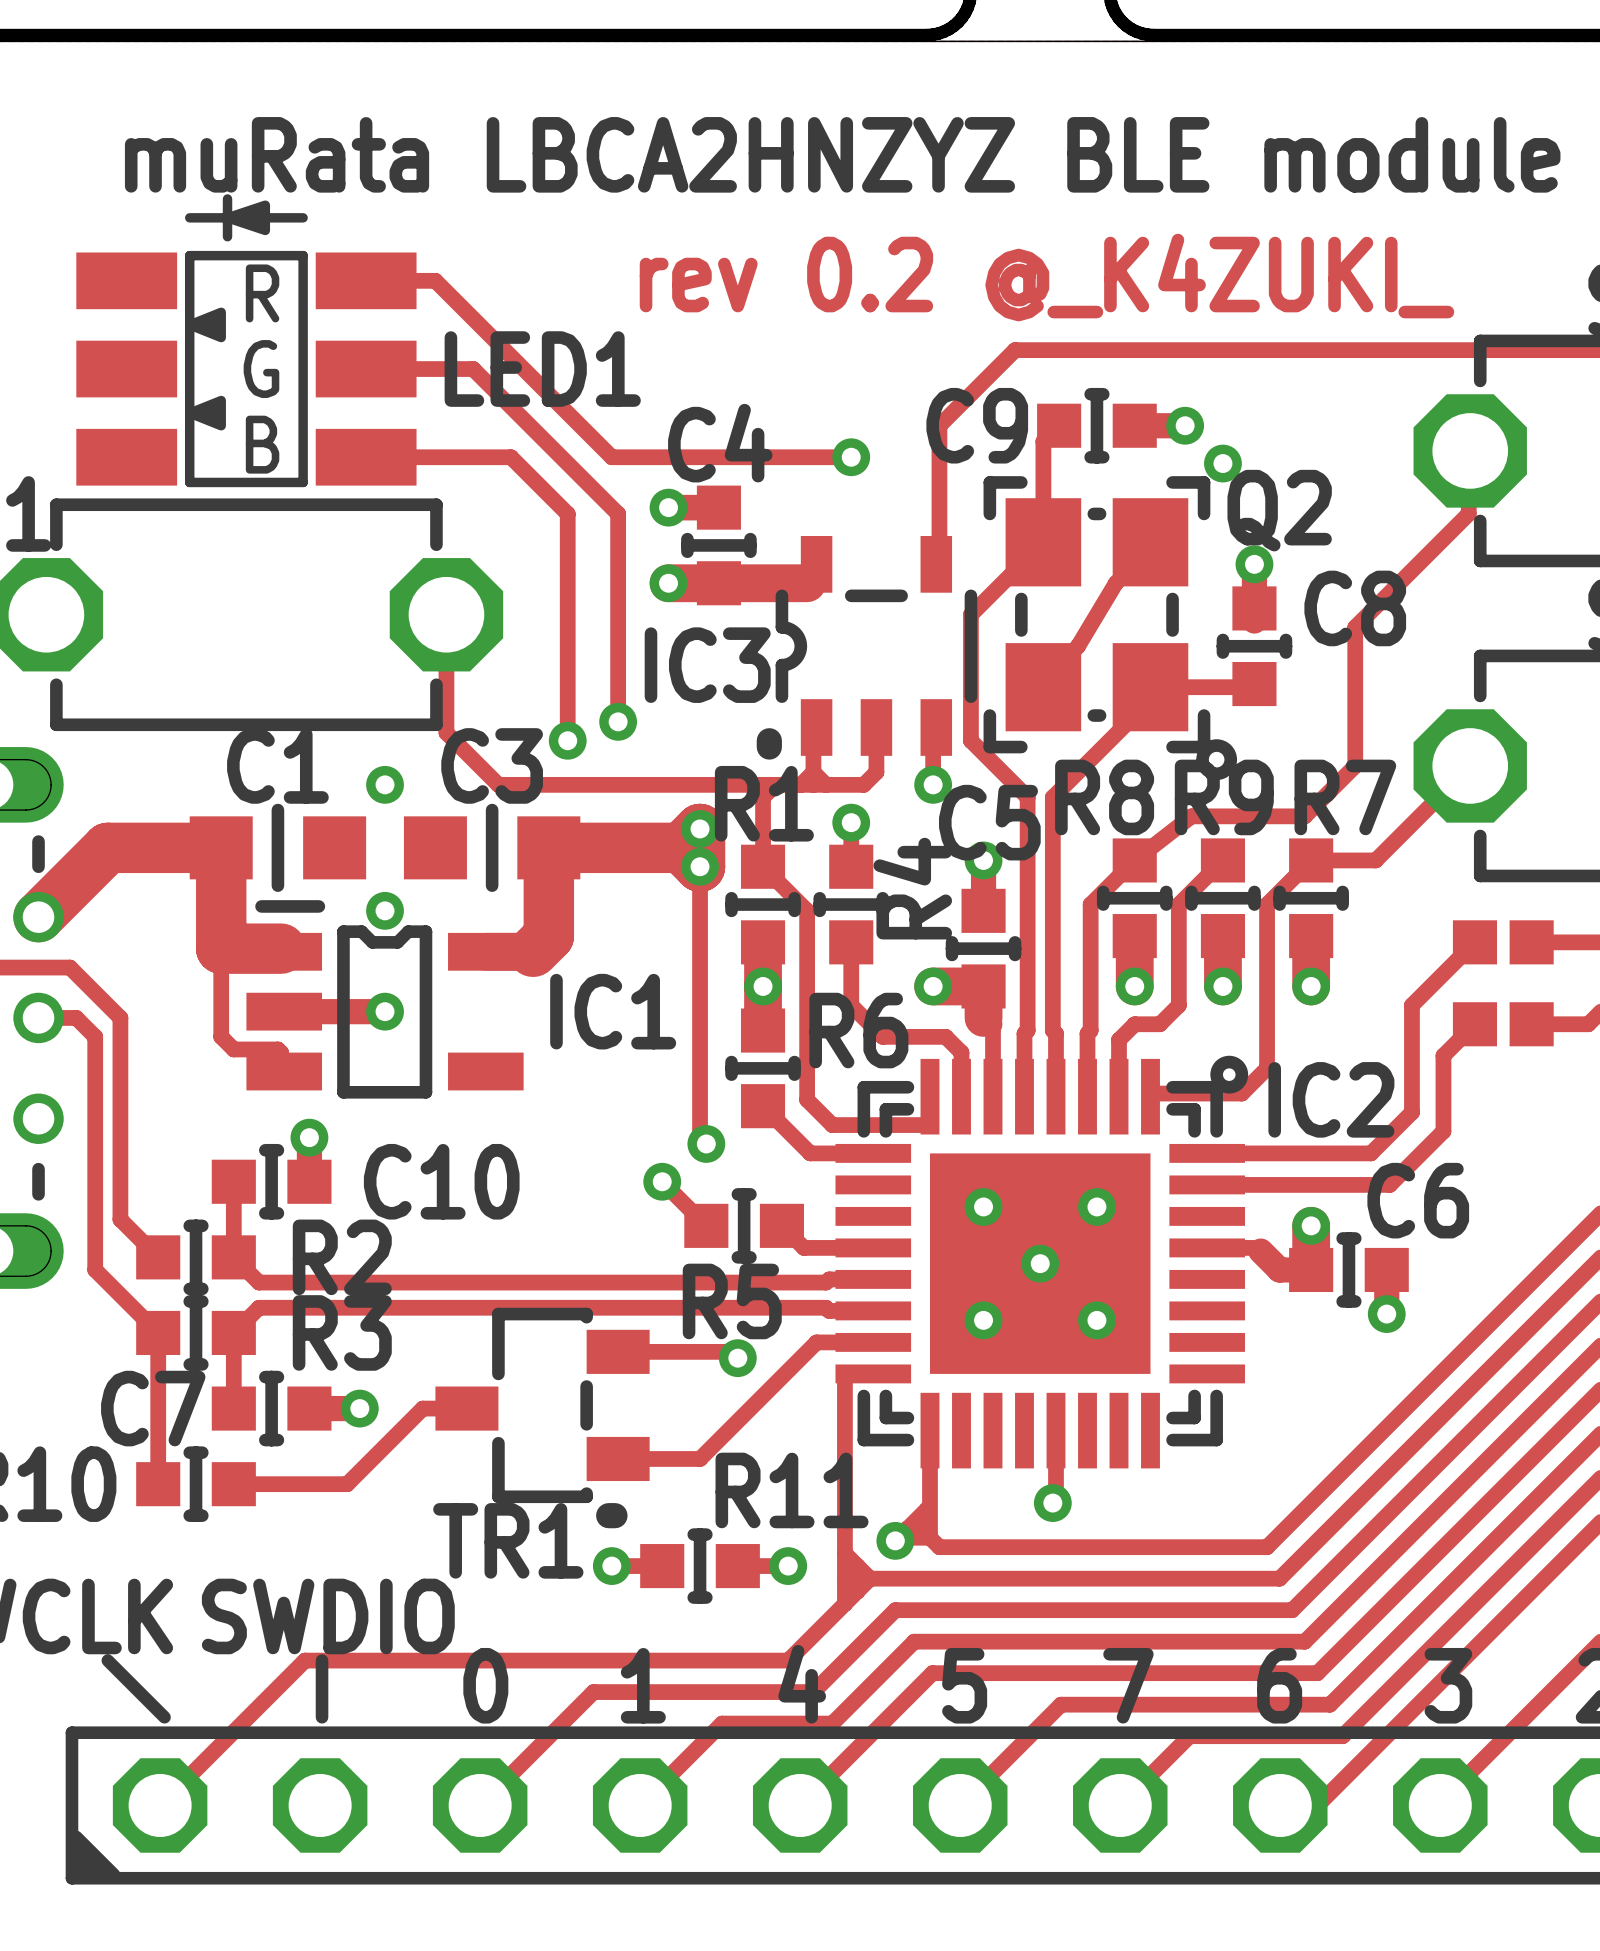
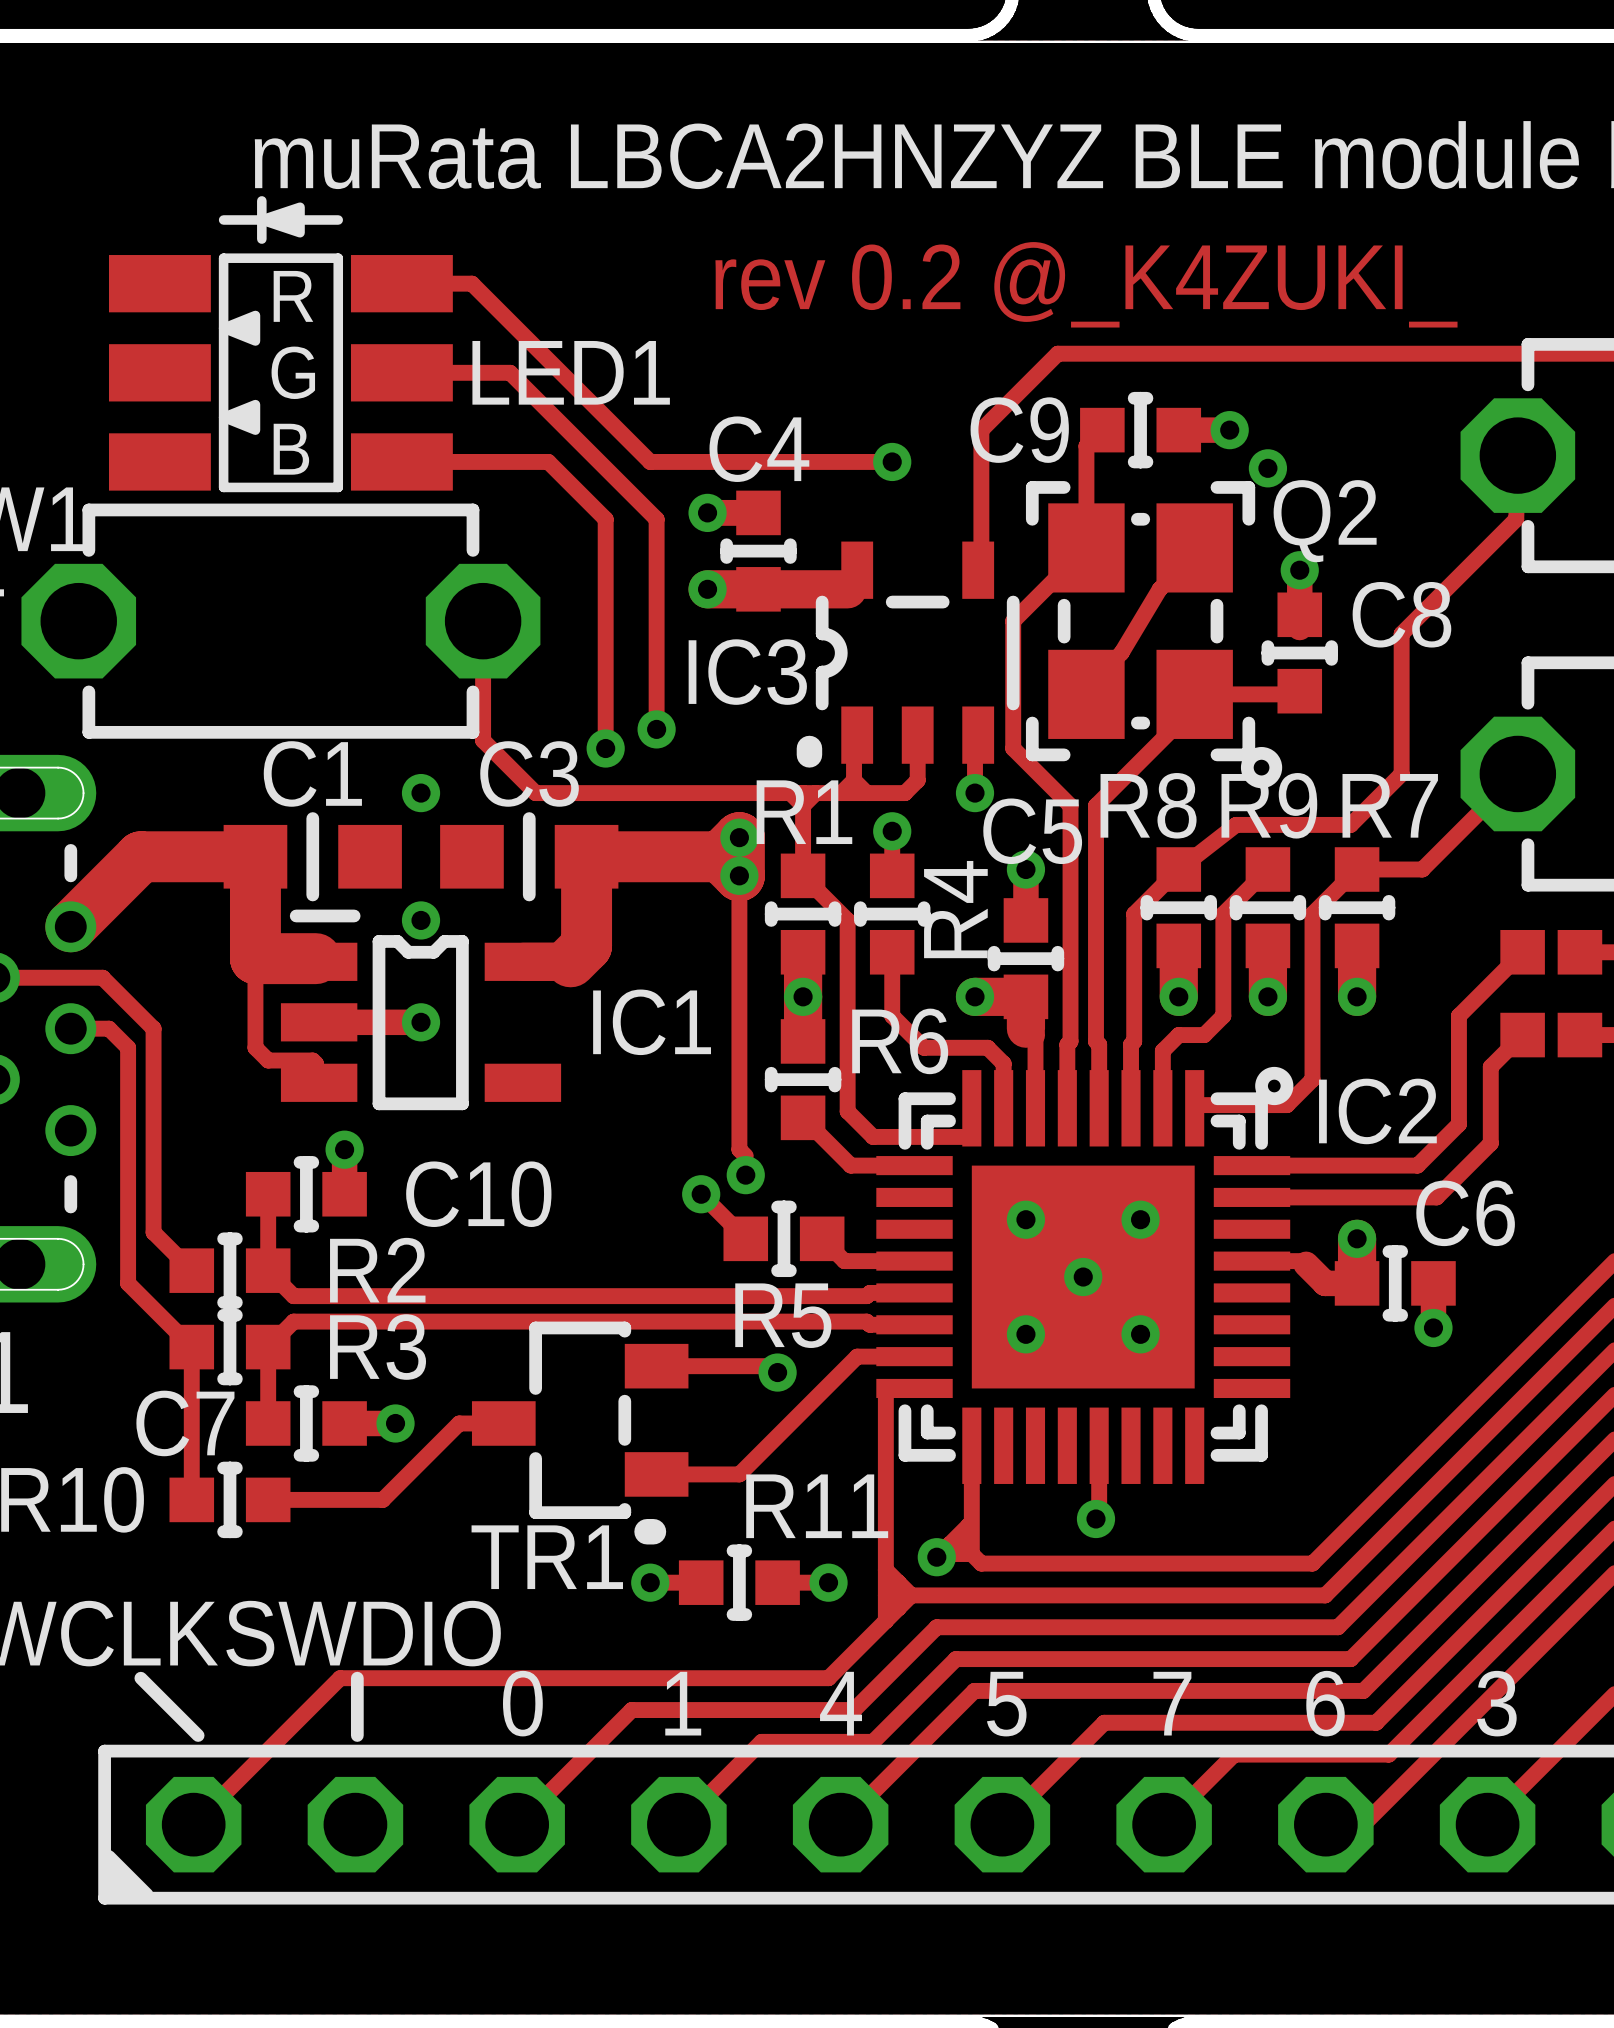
via position: (706, 1143) -> (745, 1175)

